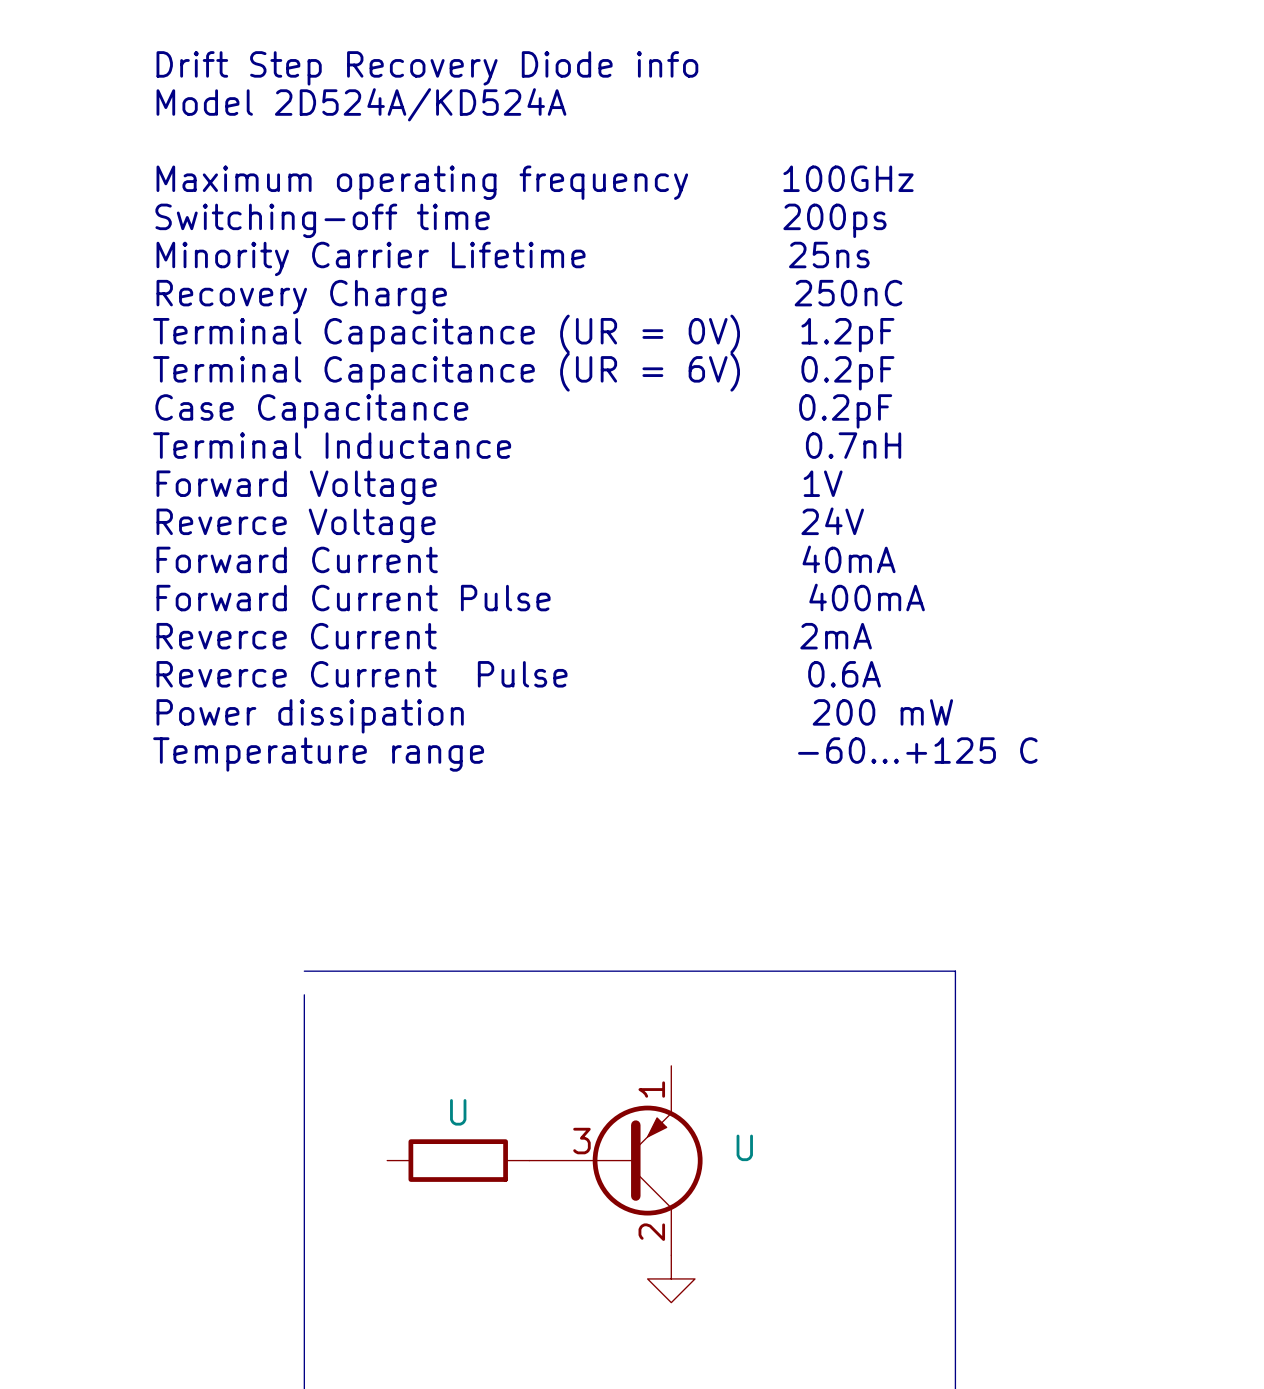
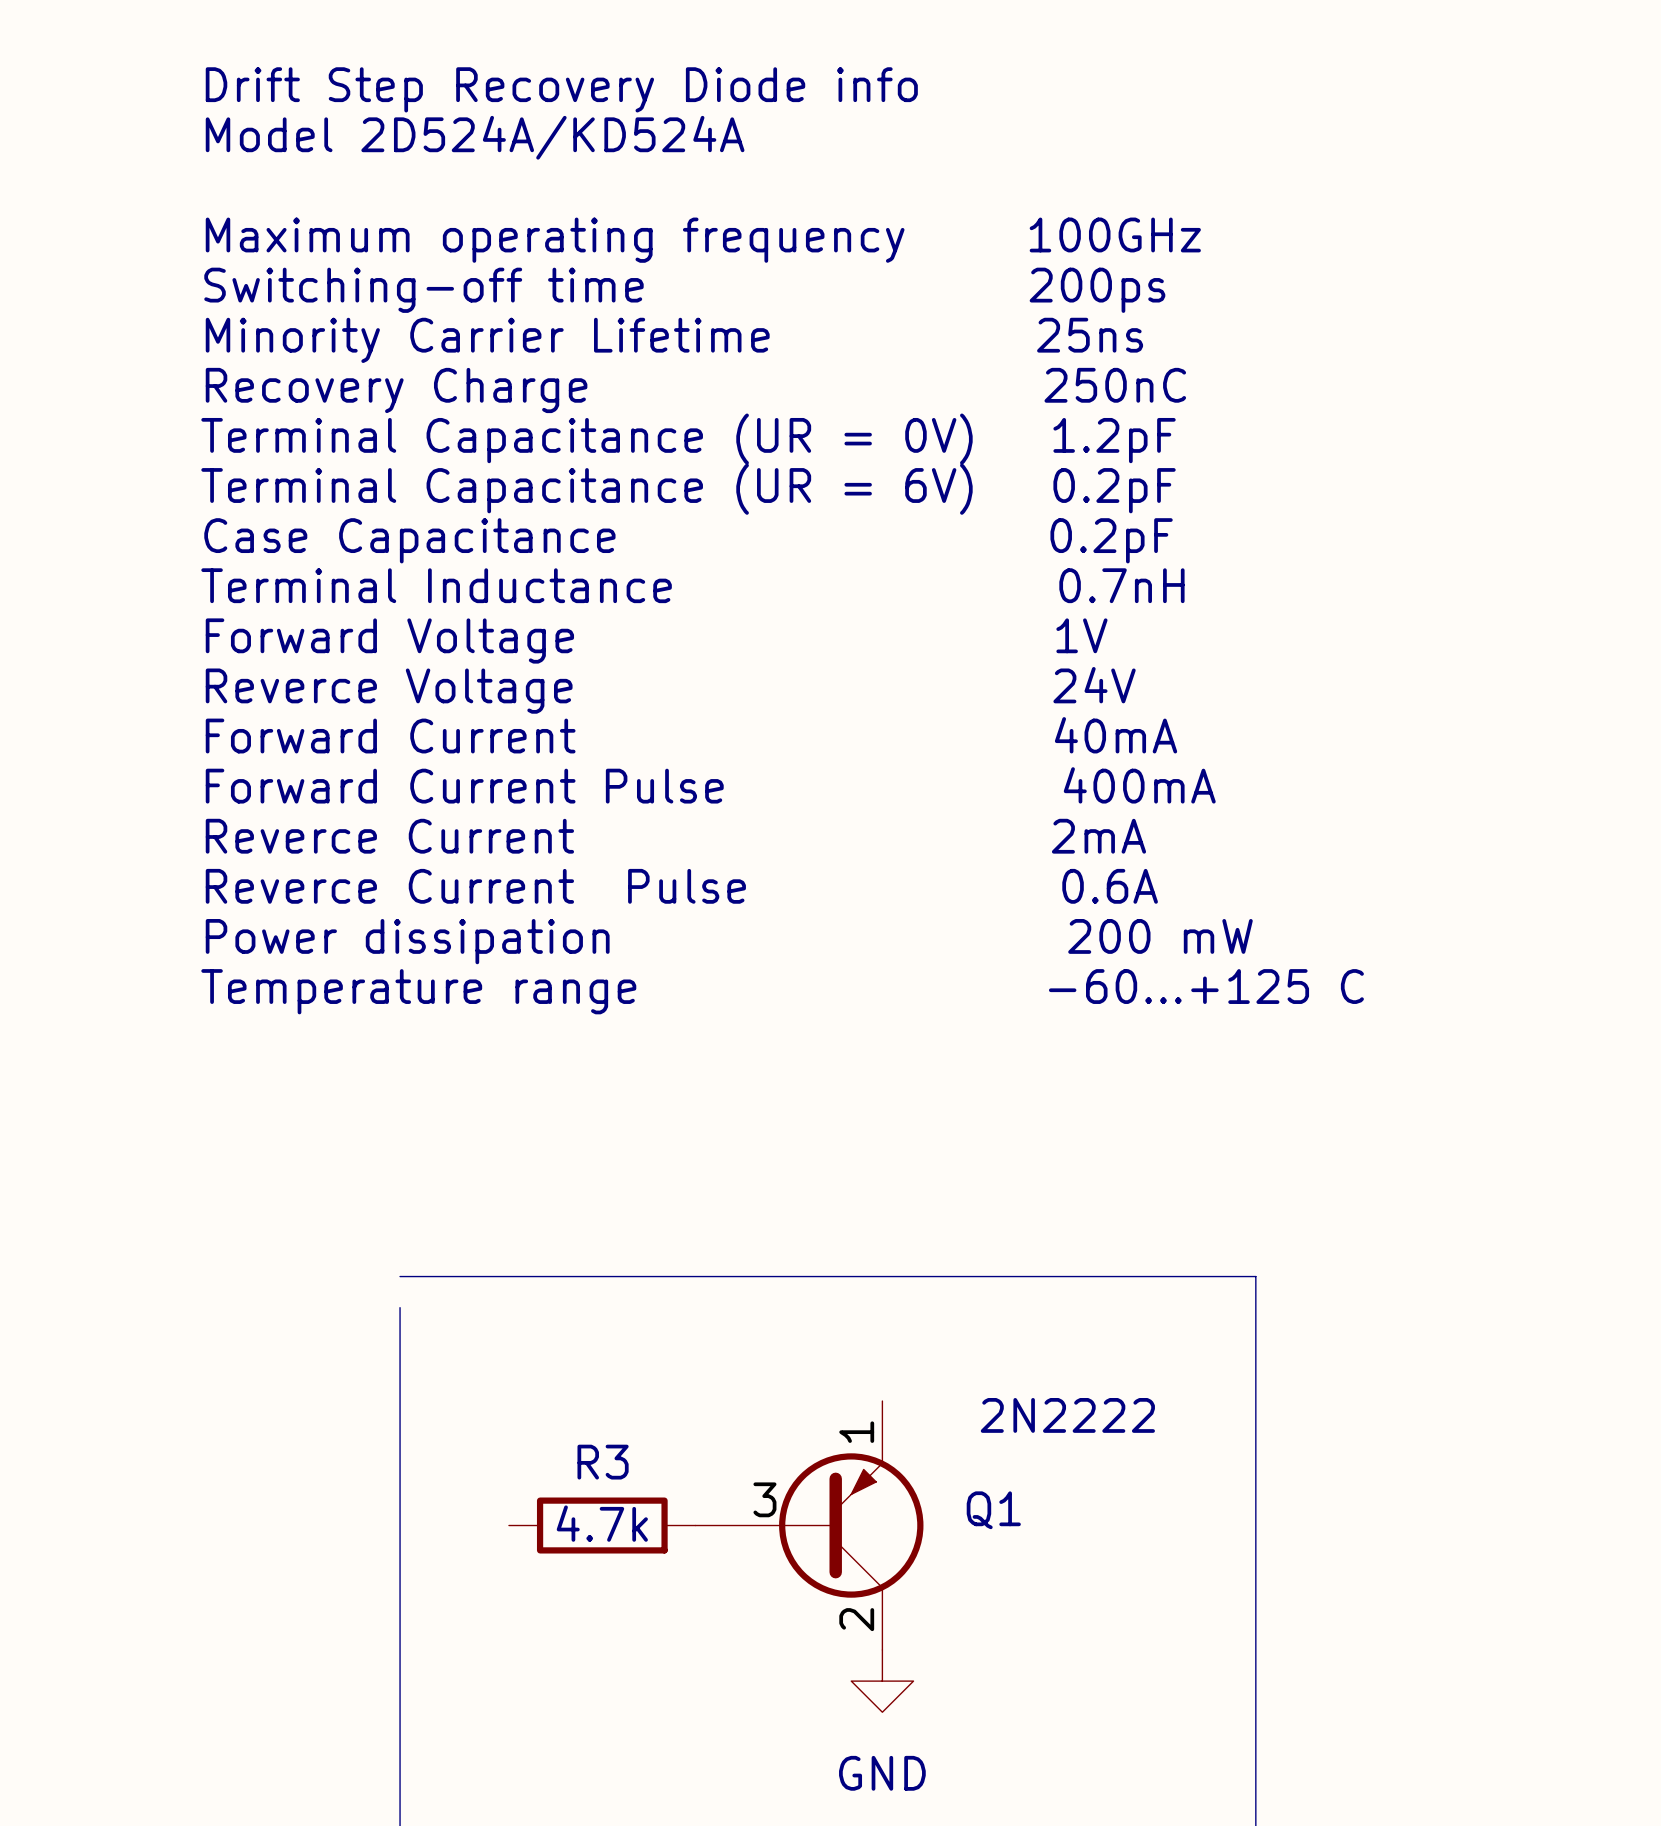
U value: none -> 2N2222 (1067, 1415)
U name: U (458, 1112) -> R3 (603, 1462)
U name: U (744, 1147) -> Q1 (993, 1510)
U value: none -> 4.7k (602, 1523)
power symbol text: none -> GND (882, 1773)

